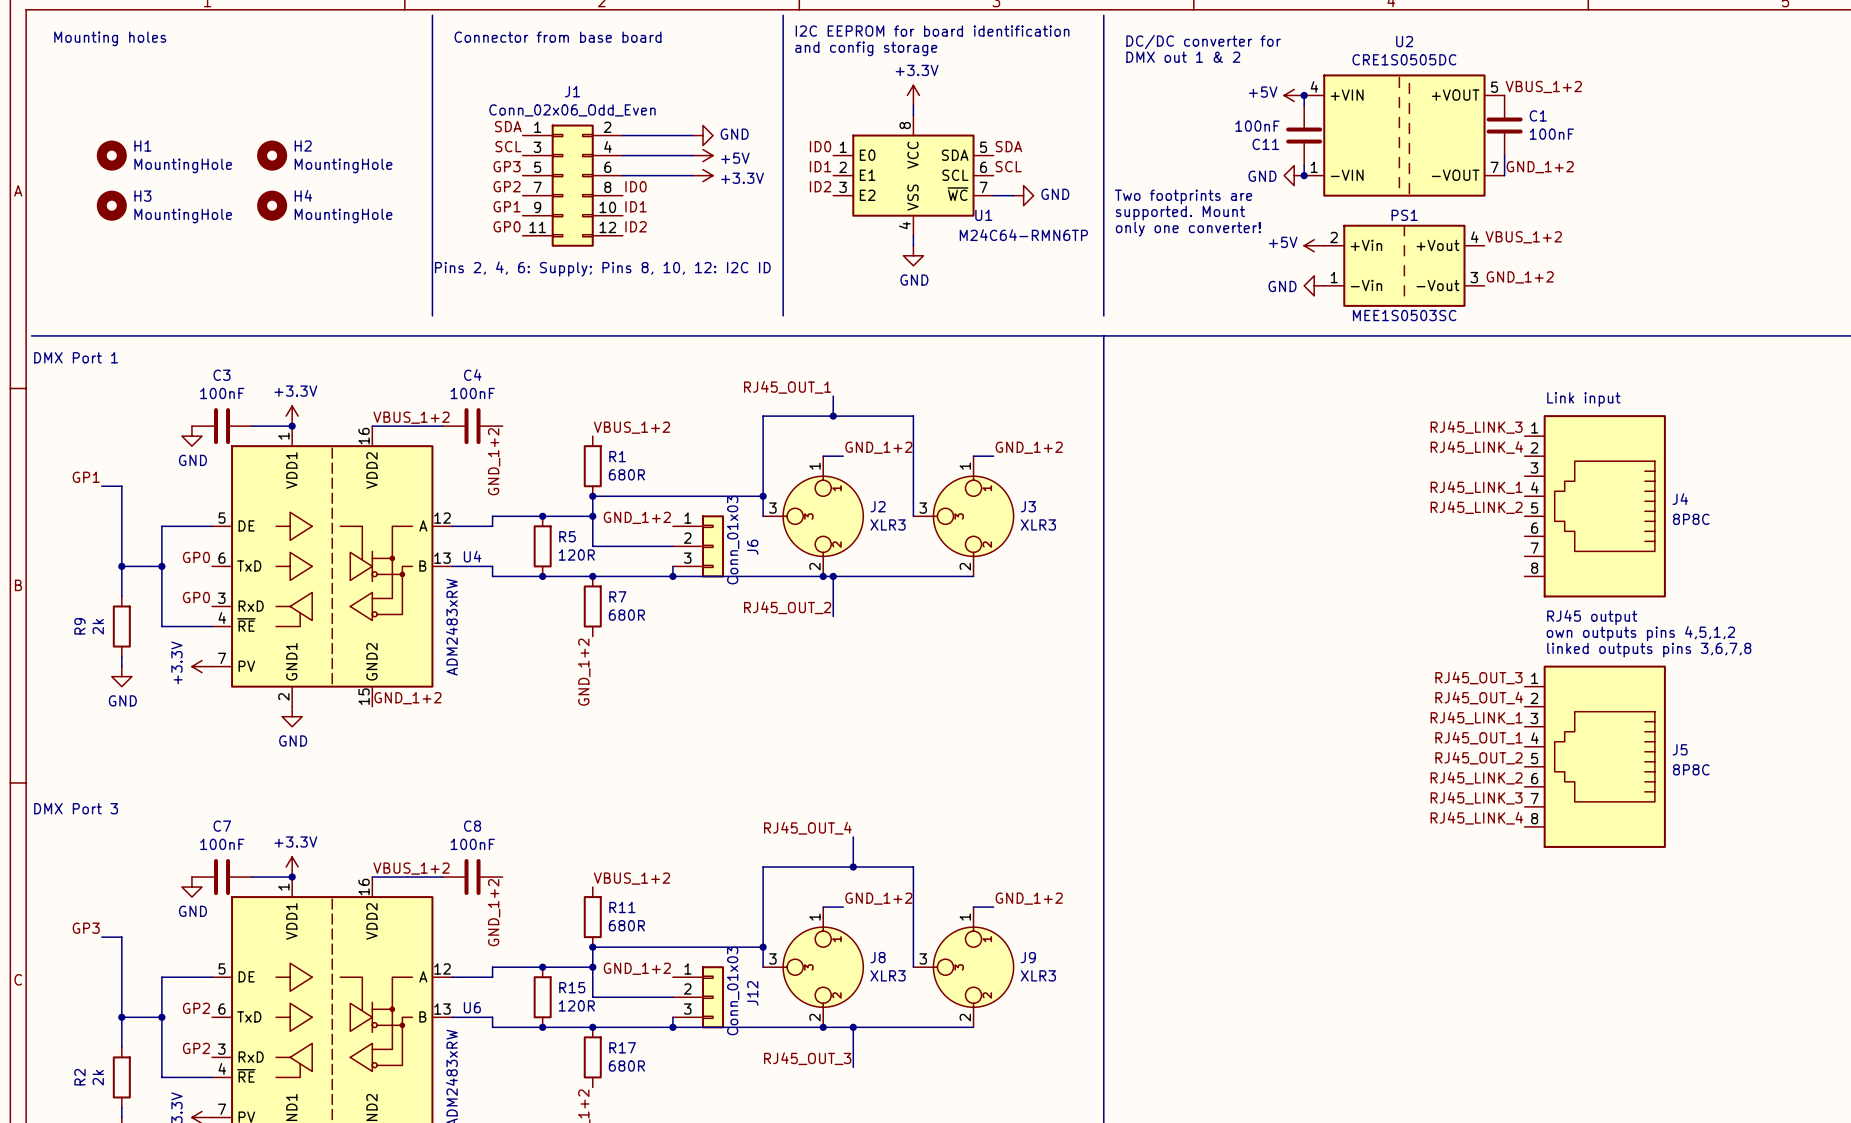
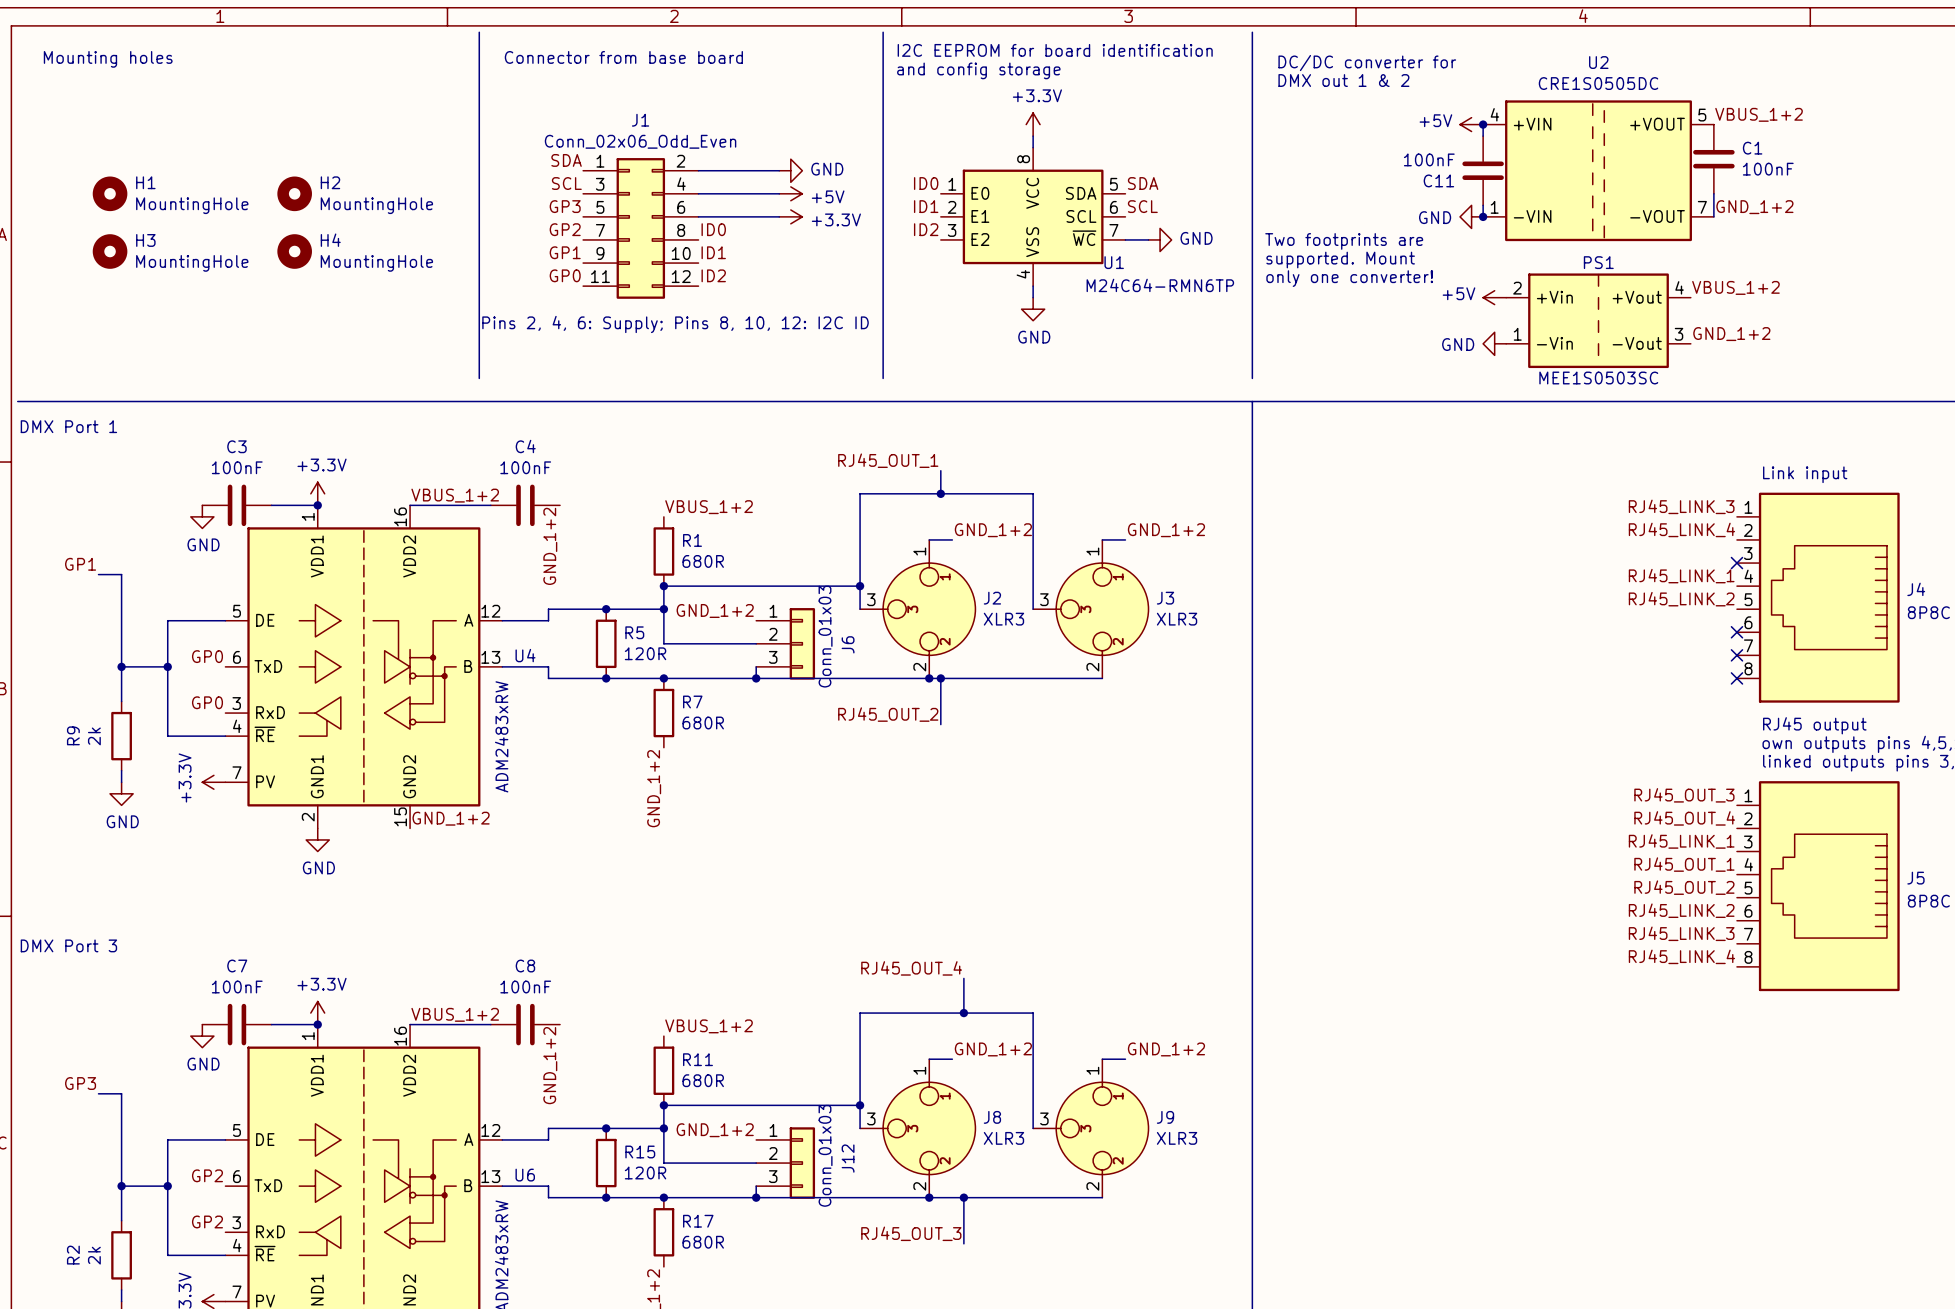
no-connect mark: none -> (1736, 563)
no-connect mark: none -> (1736, 632)
no-connect mark: none -> (1736, 655)
no-connect mark: none -> (1736, 678)

